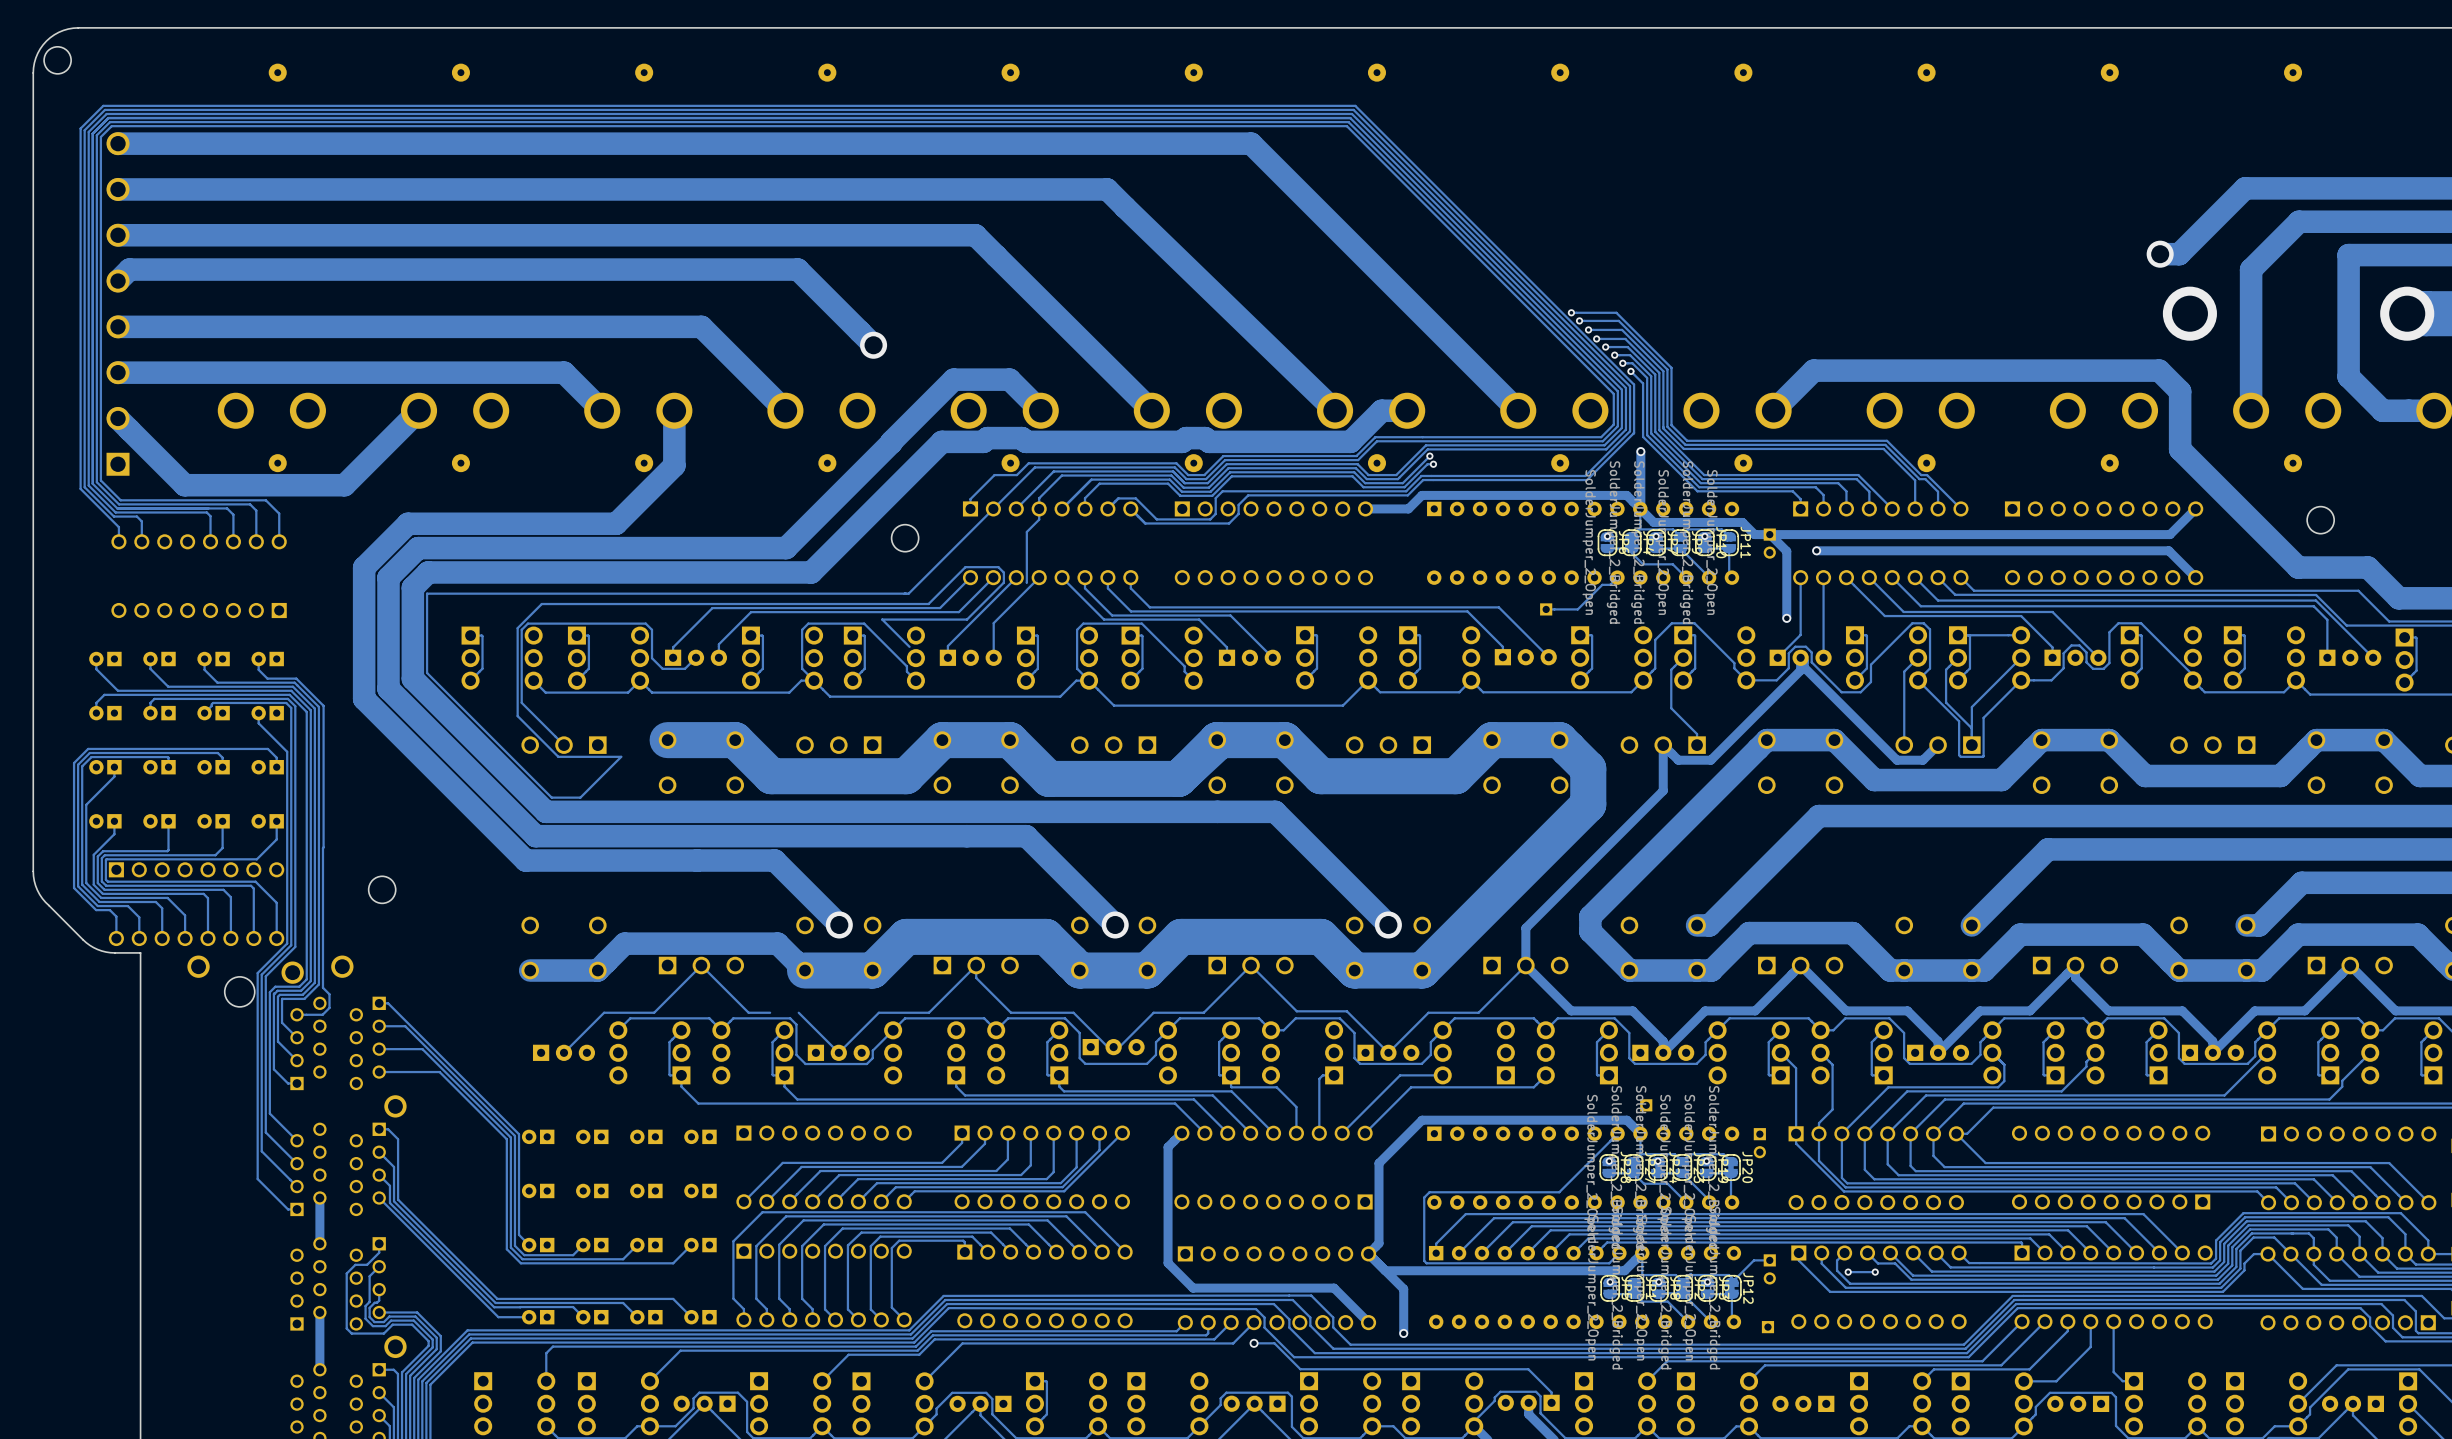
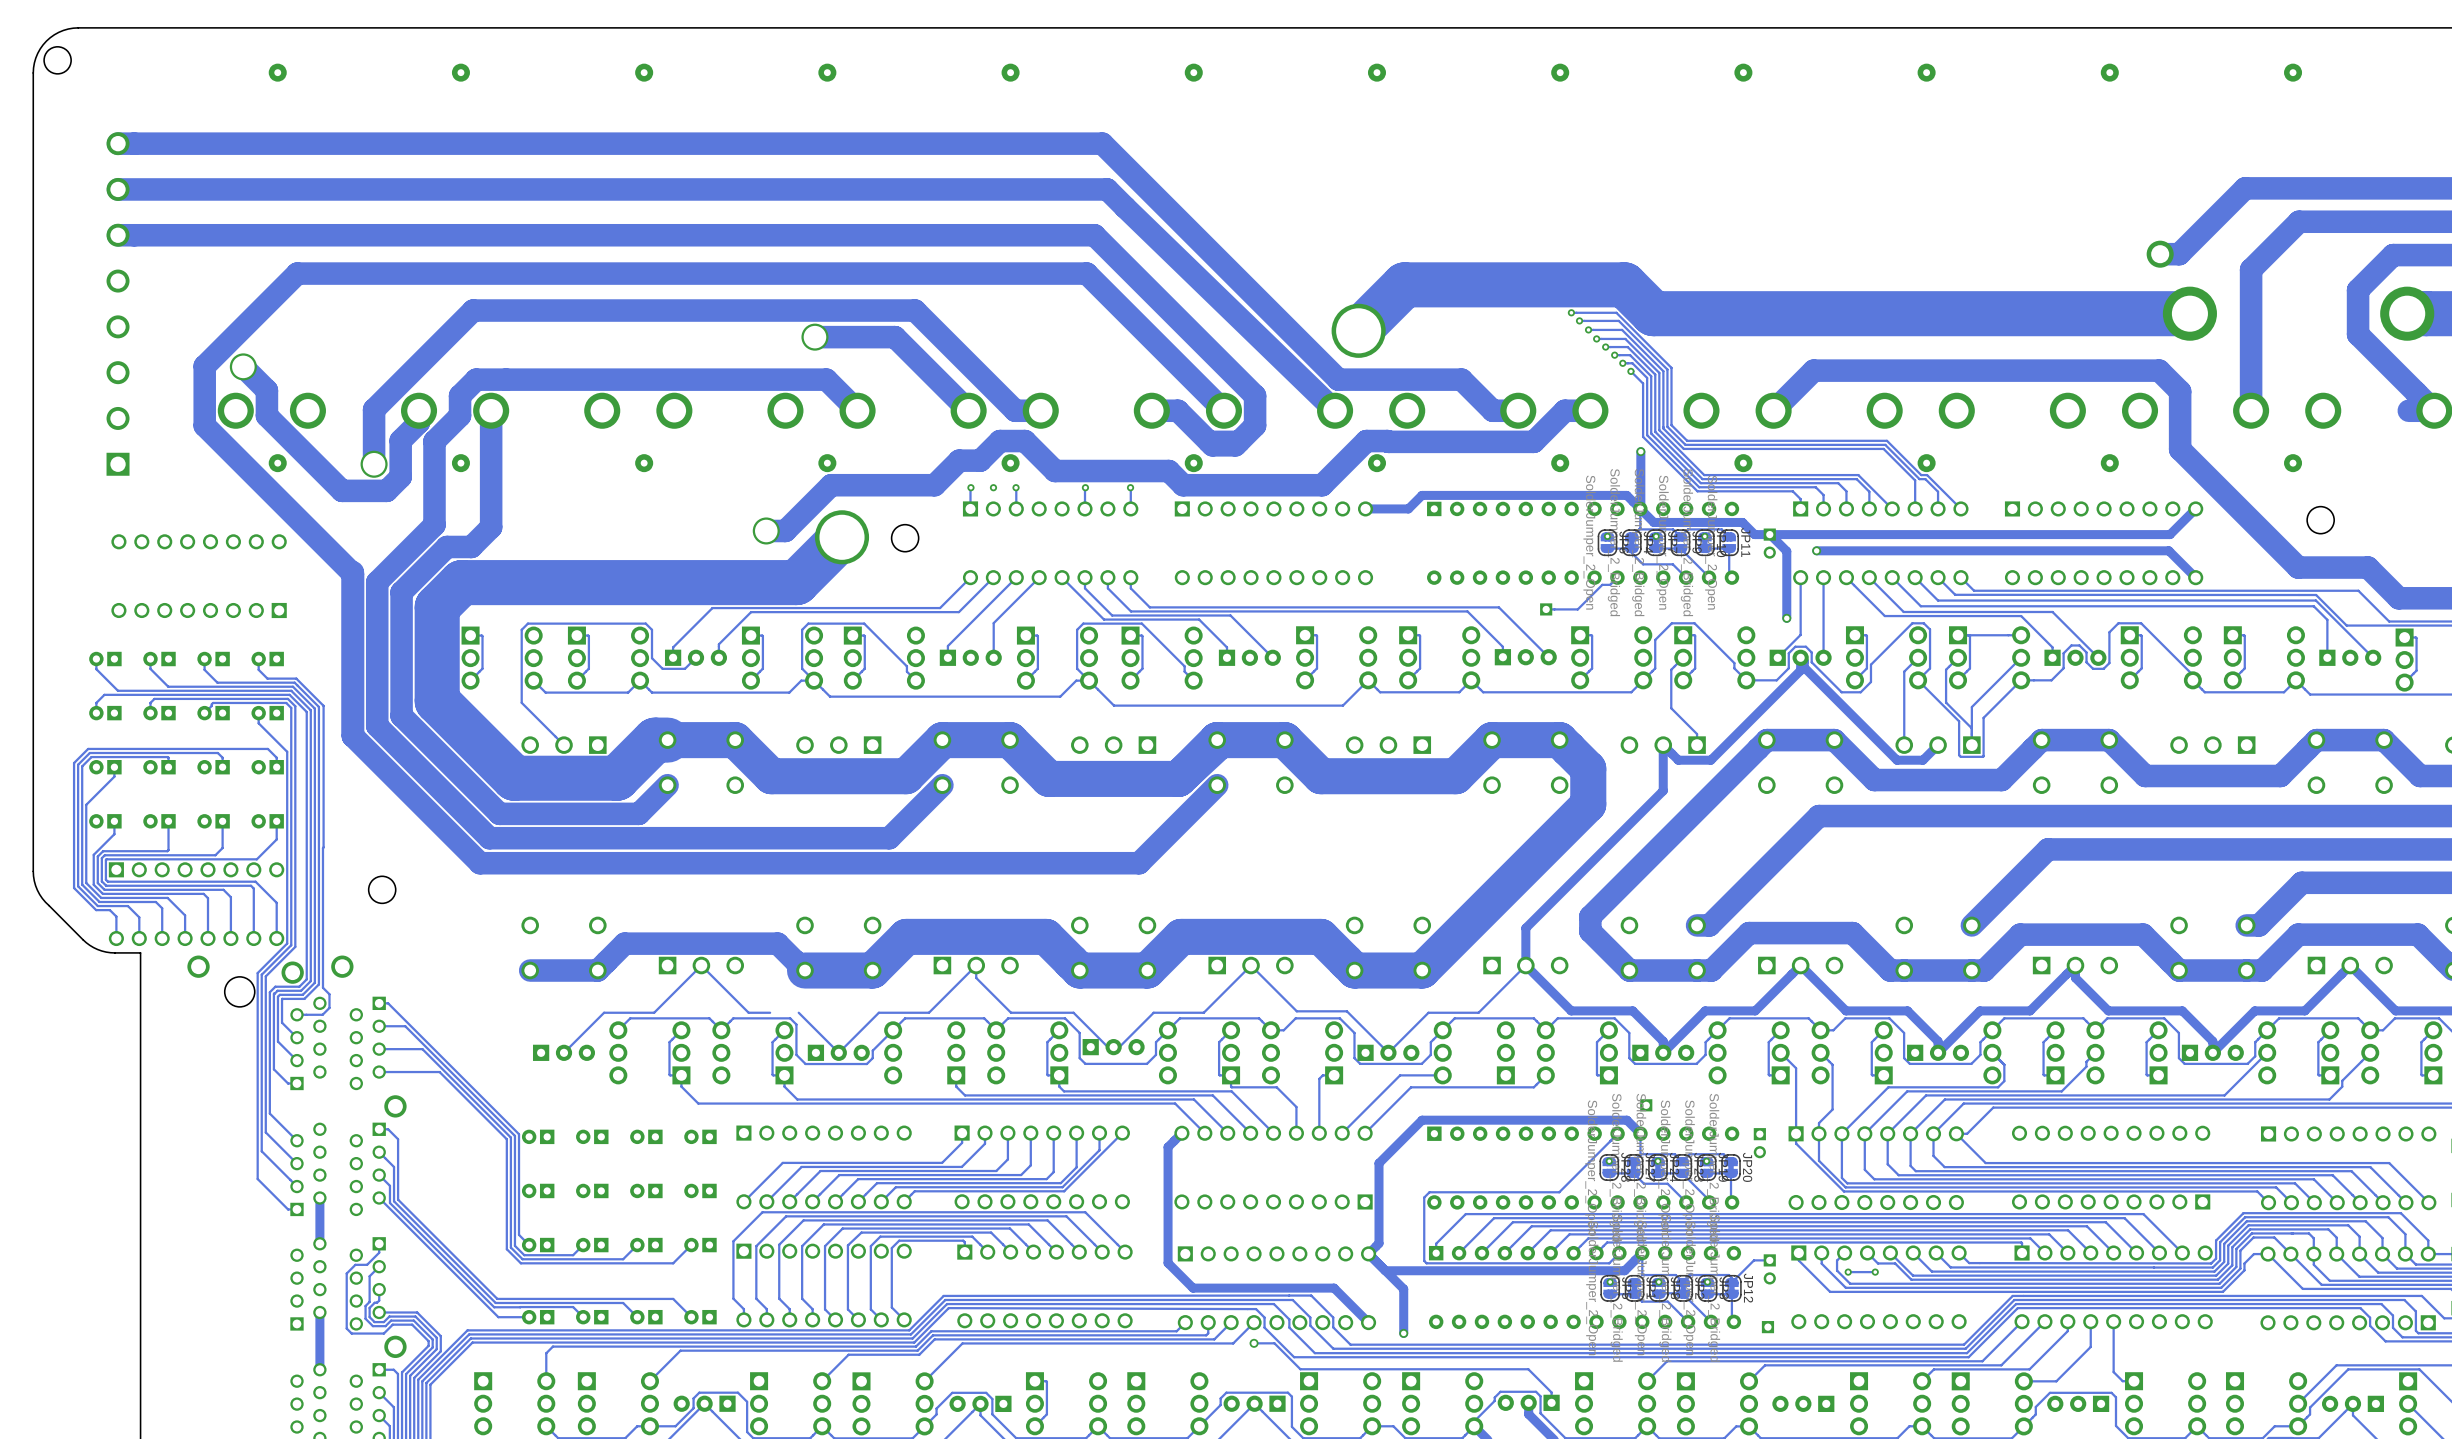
track: (1102, 143) (1251, 143) (1518, 410) -> (1102, 143) (1338, 379) (1461, 379) (1492, 410) (1518, 410)
track: (975, 235) (1151, 410) -> (975, 235) (1094, 235) (1255, 395) (1255, 425) (1235, 445) (1212, 445) (1209, 441)
track: (2393, 255) (2348, 255) (2348, 376) (2382, 410) (2408, 410) -> (2393, 255) (2358, 290) (2358, 334) (2434, 410)
track: (118, 281) (129, 269) (797, 269) (873, 345) -> none
track: none -> (2189, 313) (1653, 313) (1624, 284) (1404, 284) (1358, 330)
track: (118, 326) (701, 326) (785, 410) -> none
via: none -> (1358, 330)
track: none -> (814, 337) (895, 337) (968, 410)
via: none -> (814, 337)
via: (873, 345) -> none
via: none -> (243, 366)
track: (118, 372) (564, 372) (602, 410) -> none
track: (419, 410) (344, 485) (184, 485) (118, 418) -> (419, 410) (419, 422) (400, 440) (400, 477) (386, 490) (342, 490) (266, 415) (266, 390) (243, 366)
track: none -> (491, 410) (491, 527) (471, 546) (446, 546) (401, 592) (401, 715) (499, 813) (638, 813) (667, 785)
track: (674, 410) (674, 465) (616, 523) (408, 523) (364, 567) (364, 699) (525, 860) (774, 860) (839, 924) -> none
track: none -> (857, 410) (826, 379) (476, 379) (460, 395) (460, 415) (434, 441) (434, 524) (377, 582) (377, 725) (489, 838) (889, 838) (942, 785)
track: (1040, 410) (1009, 379) (953, 379) (786, 548) (418, 548) (388, 577) (388, 688) (535, 836) (1026, 836) (1115, 924) -> (1040, 410) (1015, 410) (915, 310) (473, 310) (374, 409) (374, 464)
track: none -> (1223, 410) (1086, 273) (297, 273) (204, 366) (204, 425) (352, 573)
track: (1407, 410) (1381, 410) (1350, 441) (1238, 441) -> none
track: none -> (1590, 410) (1564, 410) (1533, 441) (1366, 441) (1322, 485) (1183, 485) (1168, 471) (1055, 471) (1025, 441)
track: (1205, 438) (1186, 438) (1182, 441) (1025, 441) -> (1205, 438) (1177, 410) (1151, 410)
track: (1025, 441) (1022, 438) (987, 438) (983, 441) (941, 441) (811, 572) (428, 572) (412, 587) (412, 678) (545, 811) (1275, 811) (1388, 924) -> (1025, 441) (999, 441) (980, 460) (959, 460) (934, 485) (831, 485) (785, 530) (766, 530)
track: (1429, 456) (1402, 483) (1365, 483) (1354, 472) (1230, 472) (1210, 491) (1181, 491) (1169, 479) (1091, 479) (1062, 508) -> none
via: (1429, 456) -> none
via: none -> (374, 464)
track: (1433, 464) (1427, 464) (1404, 487) (1363, 487) (1352, 476) (1231, 476) (1212, 495) (1180, 495) (1168, 483) (1099, 483) (1085, 498) -> (1085, 487) (1085, 498)
via: (1433, 464) -> none
via: none -> (970, 487)
via: none -> (993, 487)
via: none -> (1016, 487)
via: none -> (1085, 487)
via: none -> (1130, 487)
track: (970, 499) (994, 475) (1016, 475) (1028, 463) (1176, 463) (1188, 475) (1204, 475) (1223, 456) (1356, 456) (1375, 437) (1601, 437) (1613, 424) (1613, 393) (1346, 126) (111, 126) (100, 136) (100, 480) (120, 500) (265, 500) (279, 513) (279, 541) -> (970, 499) (970, 487)
track: (1016, 508) (1053, 471) (1173, 471) (1184, 483) (1207, 483) (1226, 464) (1357, 464) (1368, 475) (1396, 475) (1426, 445) (1604, 445) (1621, 427) (1621, 389) (1350, 118) (108, 118) (92, 133) (92, 483) (117, 508) (227, 508) (233, 514) (233, 541) -> (1016, 508) (1016, 487)
track: (1107, 508) (1118, 498) (1135, 498) (1156, 519) (1210, 519) (1215, 513) (1215, 498) (1222, 491) (1406, 491) (1421, 475) (1585, 475) (1630, 431) (1630, 386) (1353, 109) (104, 109) (84, 130) (84, 487) (114, 516) (136, 516) (141, 521) (141, 541) -> none
track: (1130, 508) (1145, 523) (1229, 523) (1238, 513) (1238, 504) (1248, 495) (1407, 495) (1423, 480) (1587, 480) (1634, 432) (1634, 384) (1355, 105) (103, 105) (80, 128) (80, 488) (118, 527) (118, 541) -> (1130, 508) (1130, 487)
via: none -> (766, 530)
track: none -> (842, 537) (796, 582) (461, 582) (437, 607) (437, 701) (514, 778) (617, 778) (655, 740) (667, 740)
via: none -> (842, 537)
track: (210, 541) (210, 516) (206, 512) (115, 512) (88, 485) (88, 131) (106, 113) (1351, 113) (1625, 387) (1625, 429) (1606, 449) (1427, 449) (1397, 479) (1366, 479) (1355, 468) (1228, 468) (1208, 487) (1183, 487) (1171, 475) (1061, 475) (1039, 498) (1039, 519) (1026, 531) (1026, 582) -> none
track: (256, 541) (256, 510) (250, 504) (119, 504) (96, 482) (96, 135) (110, 122) (1348, 122) (1617, 391) (1617, 426) (1602, 441) (1376, 441) (1358, 460) (1225, 460) (1206, 479) (1186, 479) (1174, 467) (1034, 467) (908, 593) (427, 593) (427, 672) (551, 797) (580, 797) (621, 756) (558, 756) (517, 716) (517, 628) (541, 604) (928, 604) (965, 567) (998, 567) (1003, 572) (1003, 582) (966, 619) (882, 619) (909, 646) -> none
track: none -> (352, 572) (352, 736) (480, 863) (1139, 863) (1217, 785)
via: (839, 924) -> none
via: (1115, 924) -> none
via: (1388, 924) -> none

